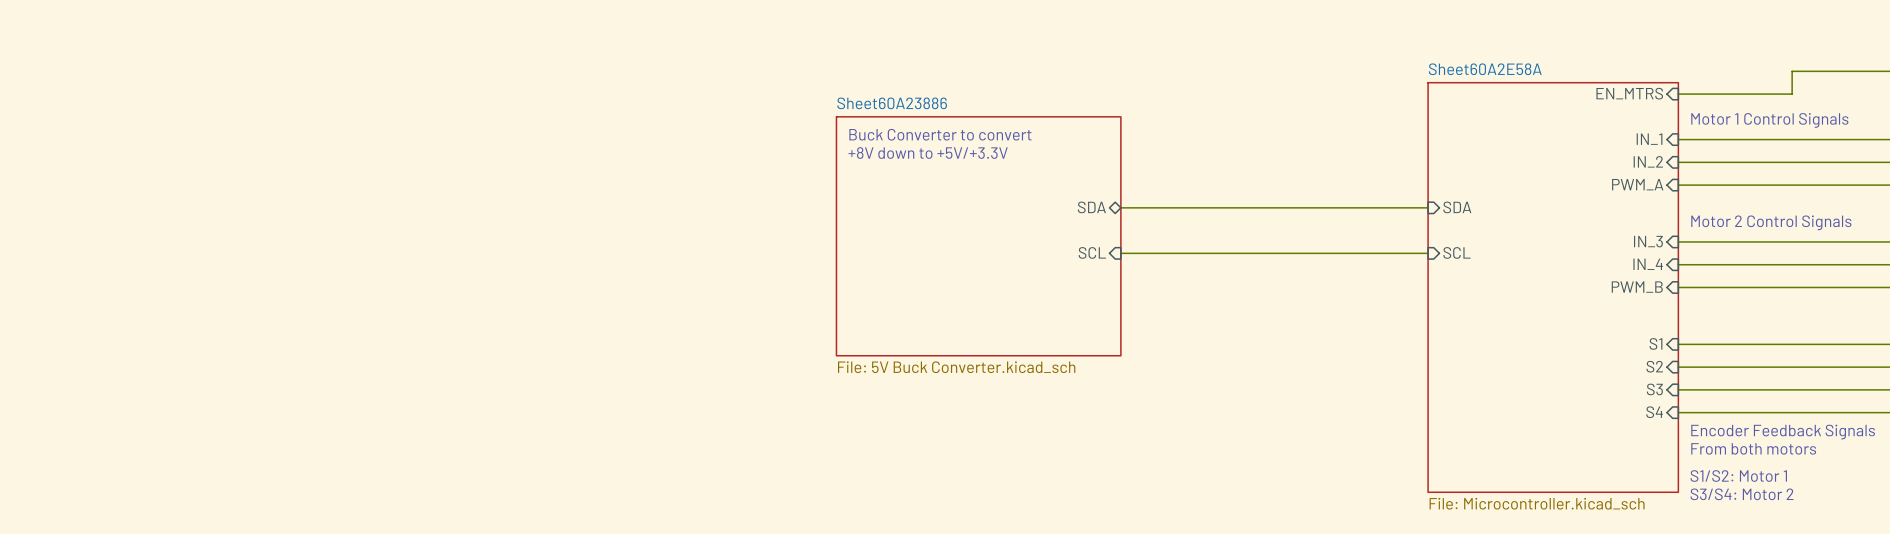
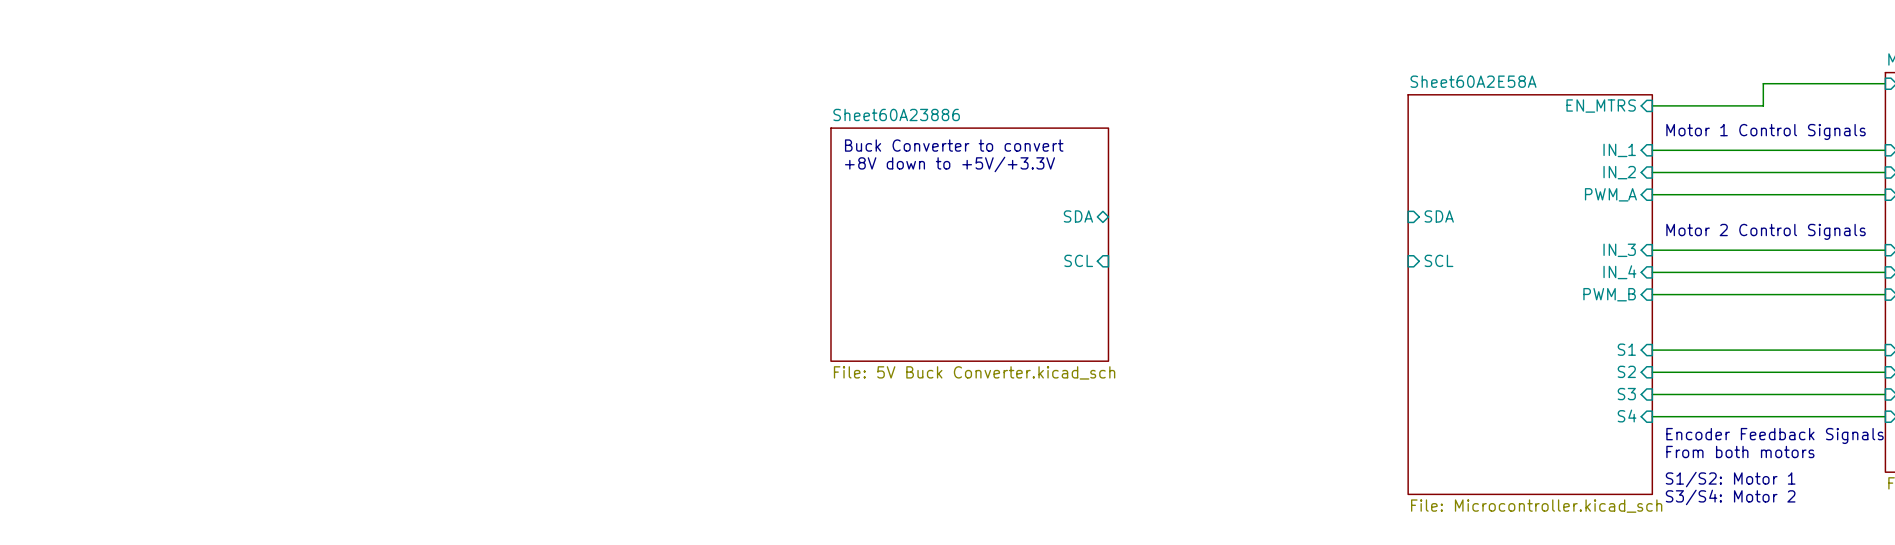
wire: (1120, 207) (1428, 207) -> none
wire: (1120, 253) (1428, 253) -> none

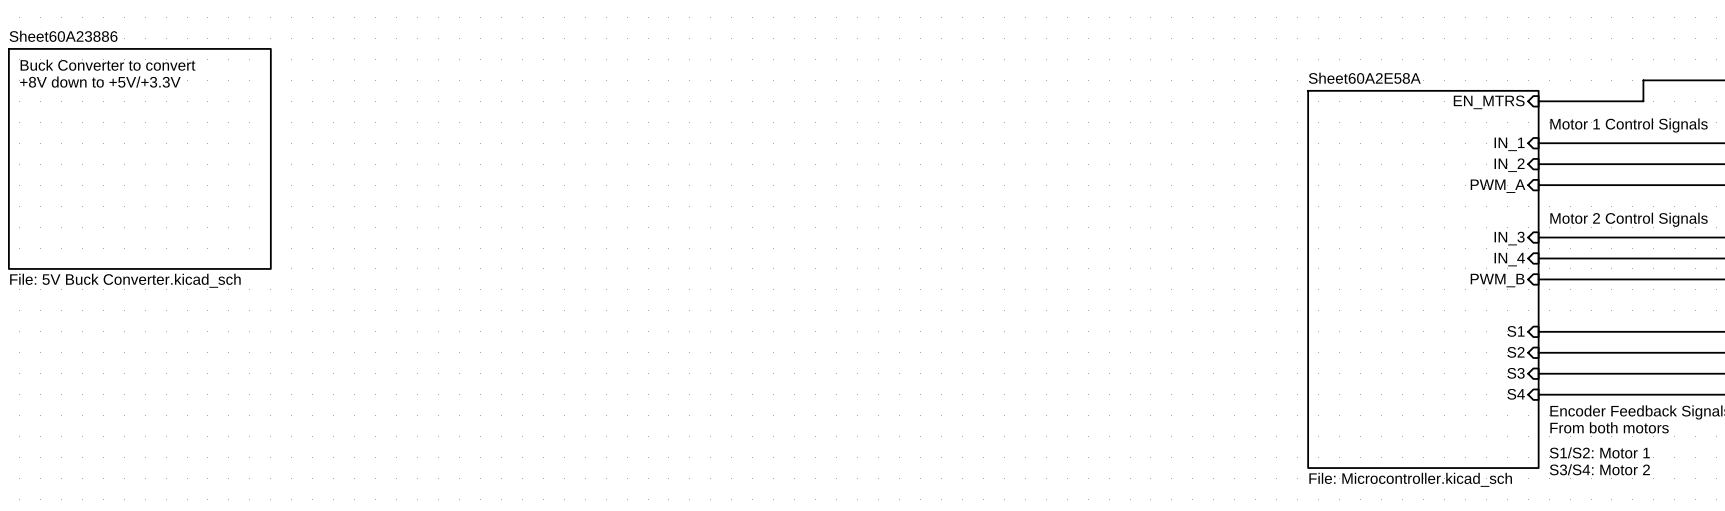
text: none -> Buck Converter to convert (107, 65)
text: none -> +8V down to +5V/+3.3V (100, 82)
text: Buck Converter to convert (954, 145) -> none
text: +8V down to +5V/+3.3V (949, 164) -> none
sheet pin: SDA (1078, 216) -> none
sheet pin: SDA (1439, 216) -> none
sheet Sheet60A23886 position: (969, 244) -> (139, 158)
sheet pin: SCL (1078, 260) -> none
sheet pin: SCL (1438, 260) -> none

